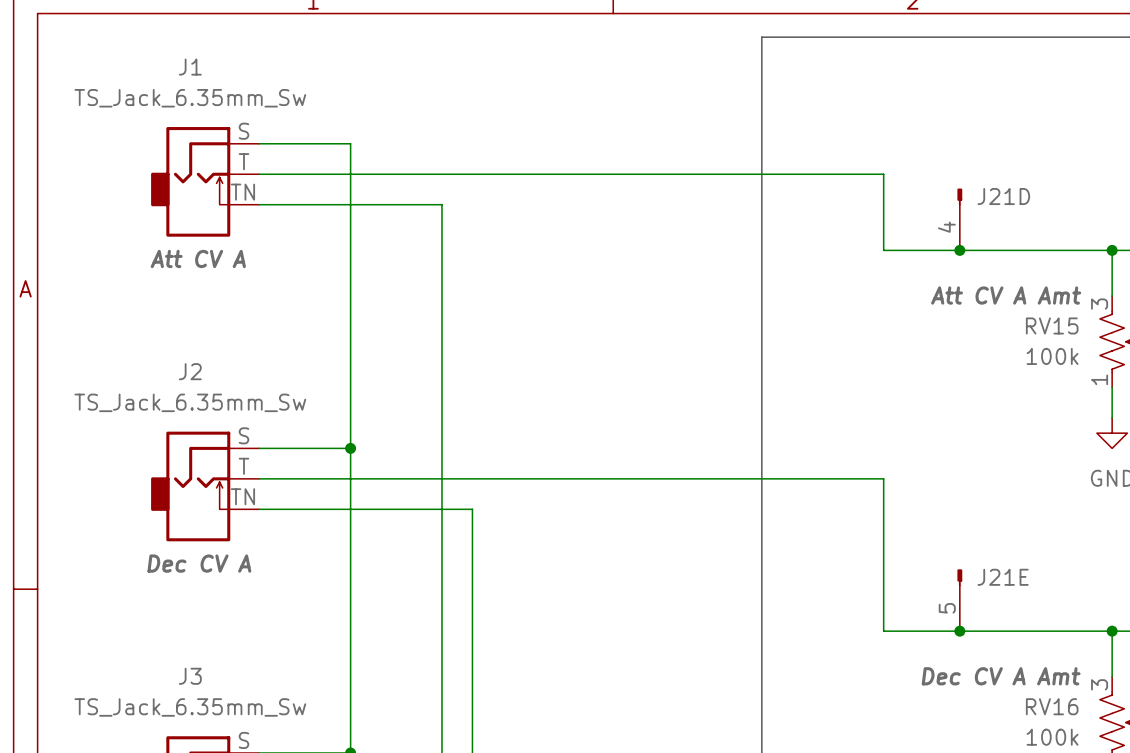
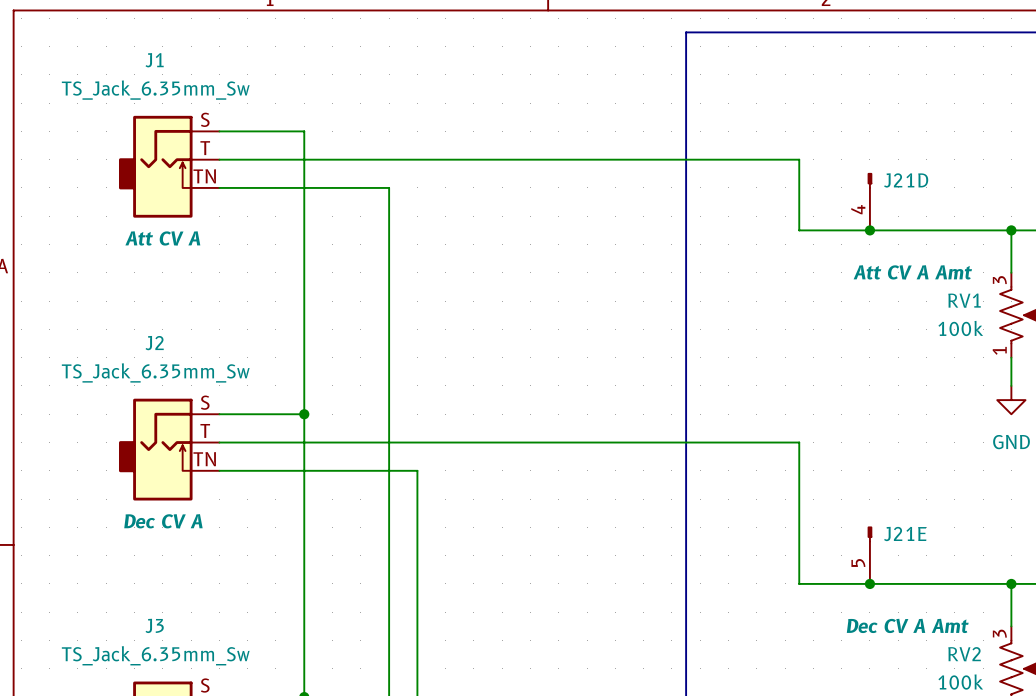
RV15 name: RV15 (1052, 325) -> RV1 (964, 300)
RV16 name: RV16 (1052, 706) -> RV2 (964, 654)

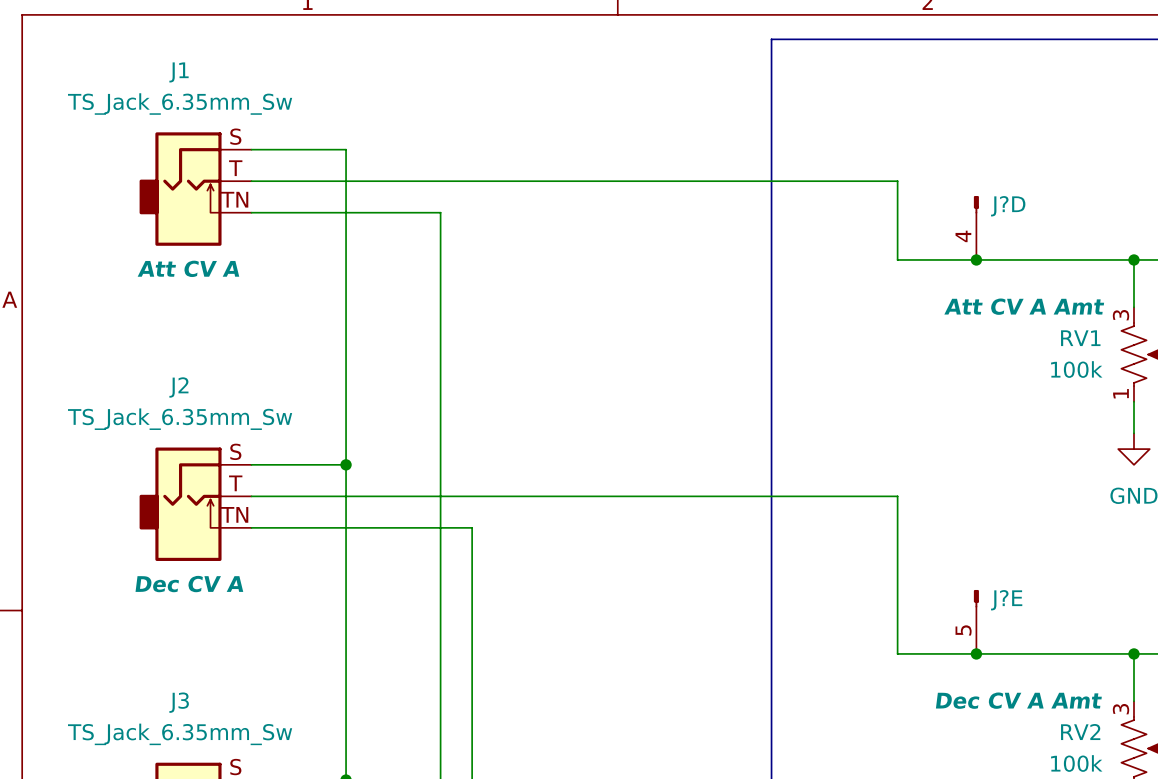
J21D name: J21D (906, 180) -> J?D (1008, 206)
J21E name: J21E (905, 534) -> J?E (1006, 600)

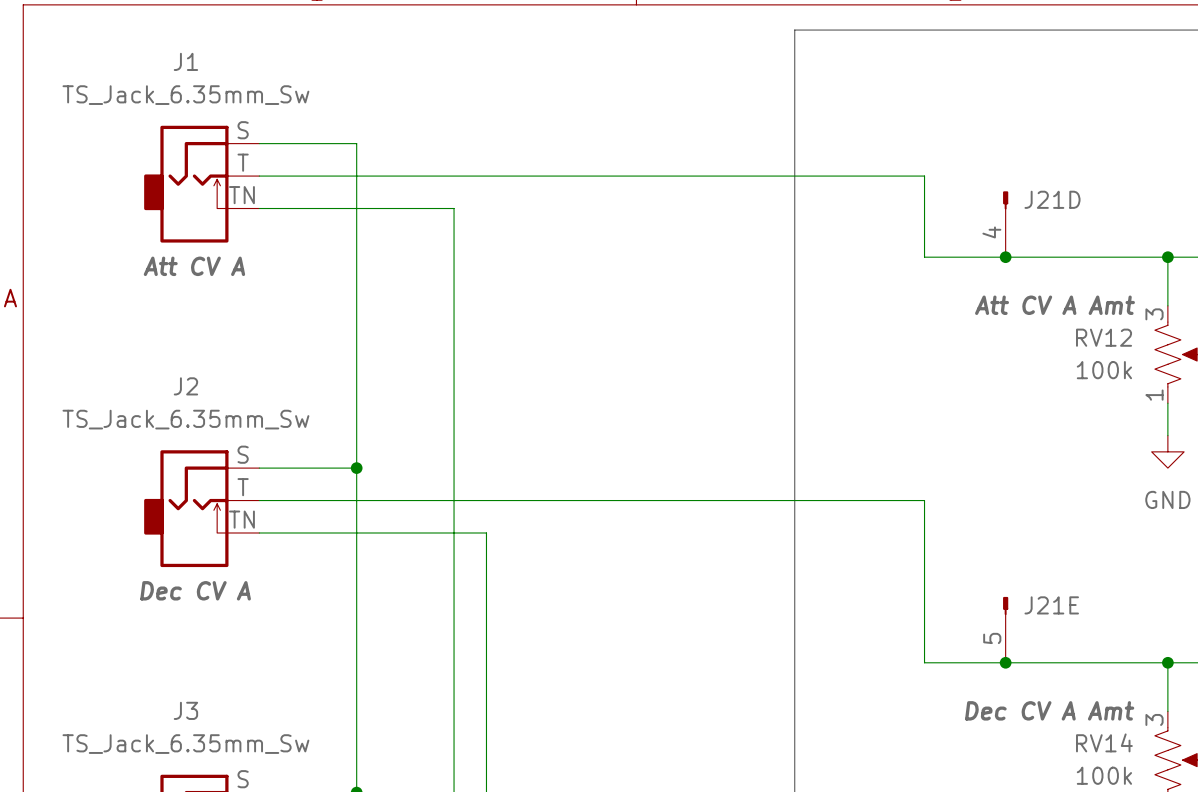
J?D name: J?D (1008, 206) -> J21D (1052, 199)
RV1 name: RV1 (1080, 338) -> RV12 (1104, 337)
J?E name: J?E (1006, 600) -> J21E (1051, 605)
RV2 name: RV2 (1080, 732) -> RV14 (1104, 742)

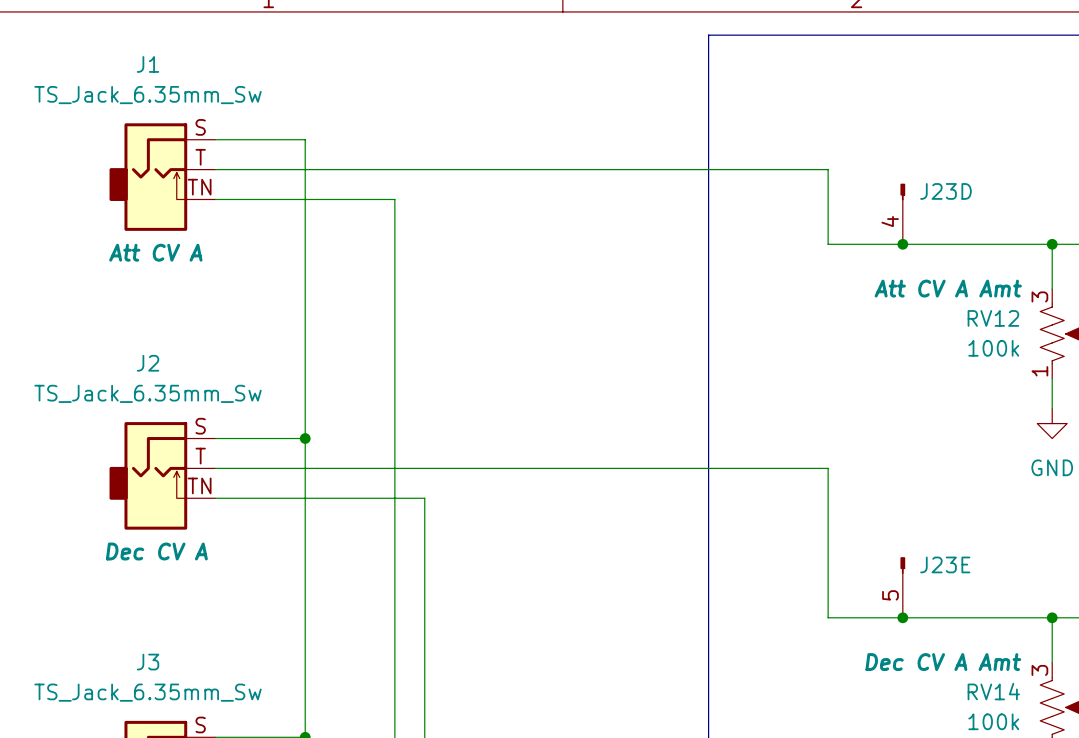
J21D name: J21D (1052, 199) -> J23D (945, 191)
J21E name: J21E (1051, 605) -> J23E (945, 564)

